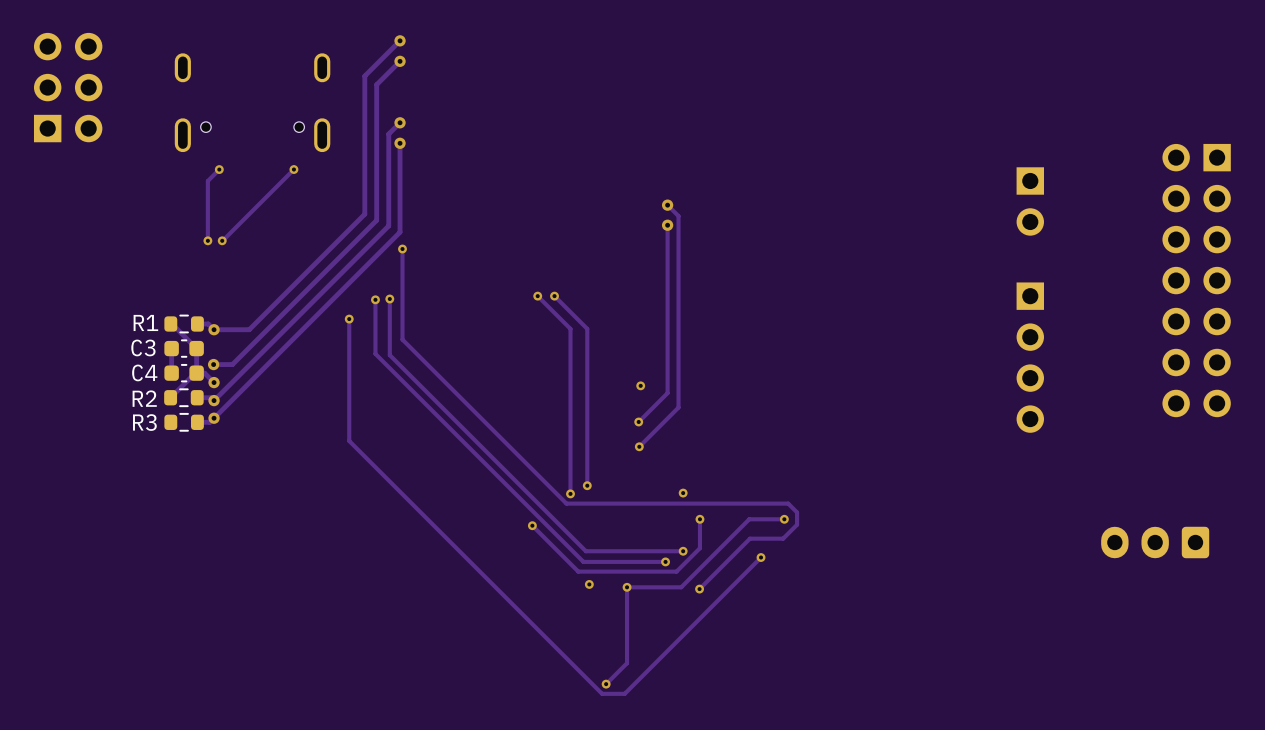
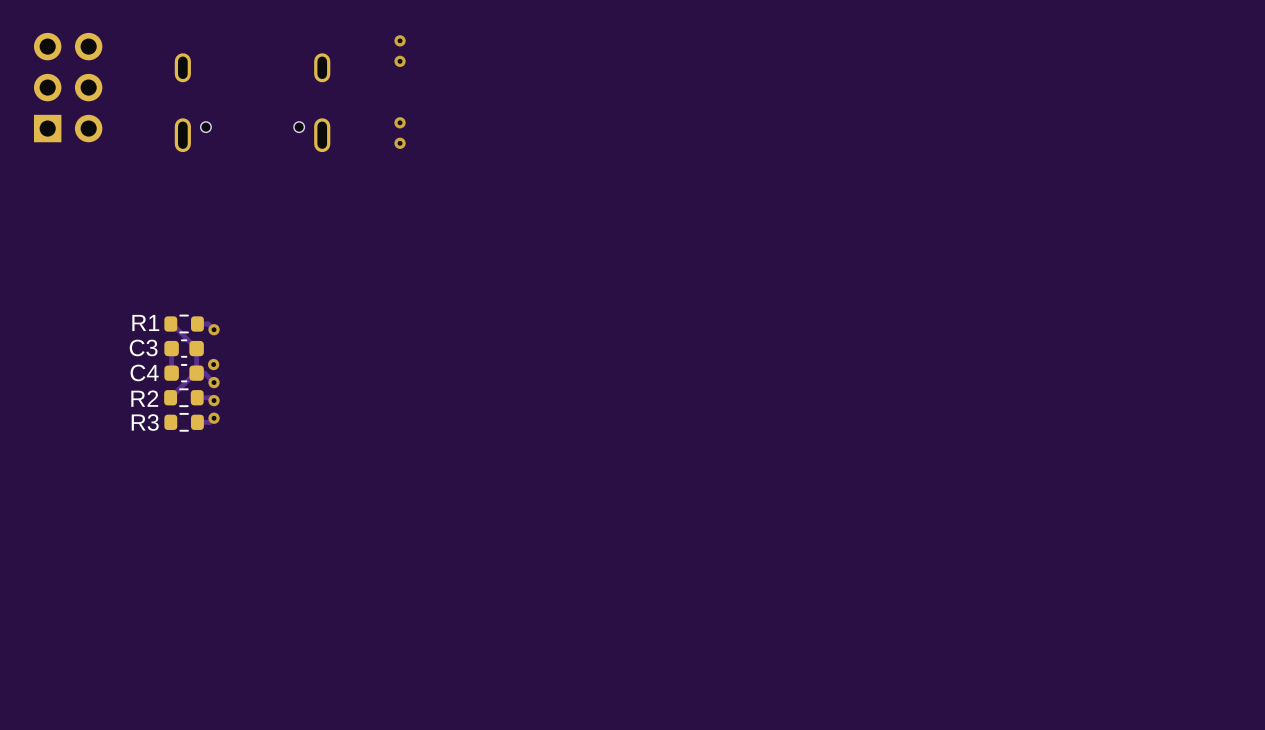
track: (400, 40) (364, 76) (364, 214) (249, 329) (214, 329) -> none
track: (400, 61) (376, 84) (376, 220) (232, 364) (213, 364) -> none
track: (400, 122) (388, 134) (388, 225) (214, 400) -> none
track: (400, 143) (400, 232) (214, 418) -> none
track: (219, 169) (207, 181) (207, 240) -> none
via: (219, 169) -> none
track: (293, 169) (222, 240) -> none
via: (293, 169) -> none
part: (1030, 201) -> none
track: (667, 205) (678, 216) (678, 407) (639, 446) -> none
via: (667, 205) -> none
track: (667, 225) (667, 393) (638, 421) -> none
via: (667, 225) -> none
via: (207, 240) -> none
via: (222, 240) -> none
track: (402, 249) (402, 339) (566, 503) (788, 503) (797, 512) (797, 524) (783, 538) (749, 538) (699, 589) -> none
via: (402, 249) -> none
part: (1196, 280) -> none
track: (537, 296) (570, 328) (570, 493) -> none
via: (537, 296) -> none
track: (554, 296) (587, 328) (587, 485) -> none
via: (554, 296) -> none
track: (389, 298) (389, 355) (585, 551) (683, 551) -> none
via: (389, 298) -> none
track: (375, 299) (375, 353) (583, 561) (665, 561) -> none
via: (375, 299) -> none
track: (349, 319) (349, 440) (602, 693) (624, 693) (761, 557) -> none
via: (349, 319) -> none
part: (1030, 357) -> none
via: (640, 385) -> none
via: (638, 421) -> none
via: (639, 446) -> none
via: (587, 485) -> none
via: (570, 493) -> none
via: (683, 493) -> none
track: (699, 519) (699, 548) (676, 571) (578, 571) (532, 525) -> none
via: (699, 519) -> none
track: (784, 519) (749, 519) (681, 587) (627, 587) (627, 663) (606, 684) -> none
via: (784, 519) -> none
via: (532, 525) -> none
part: (1155, 542) -> none
via: (683, 551) -> none
via: (761, 557) -> none
via: (665, 561) -> none
via: (589, 584) -> none
via: (627, 587) -> none
via: (699, 589) -> none
via: (606, 684) -> none

